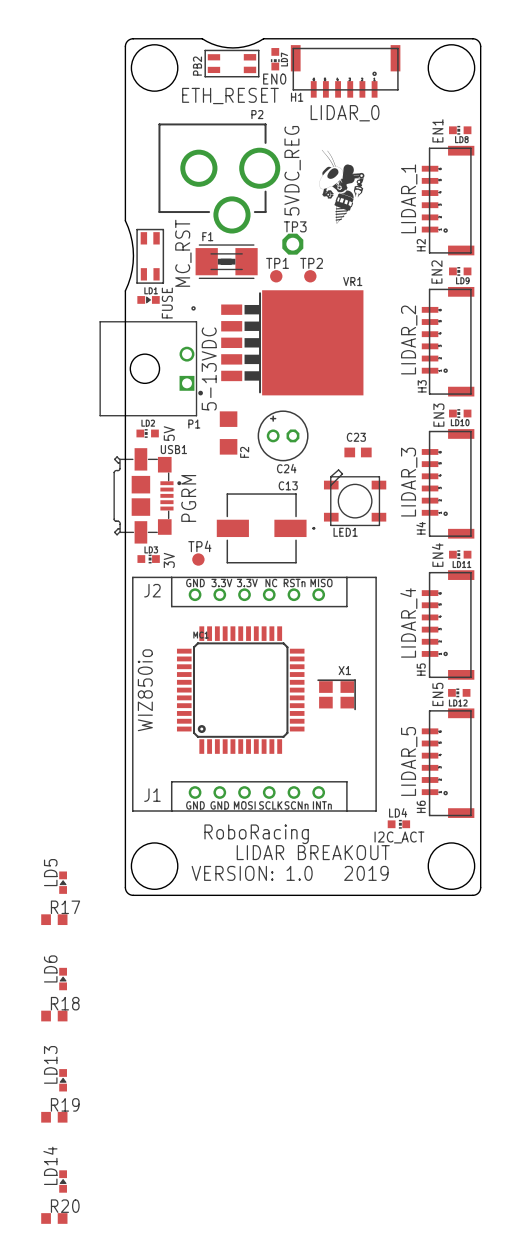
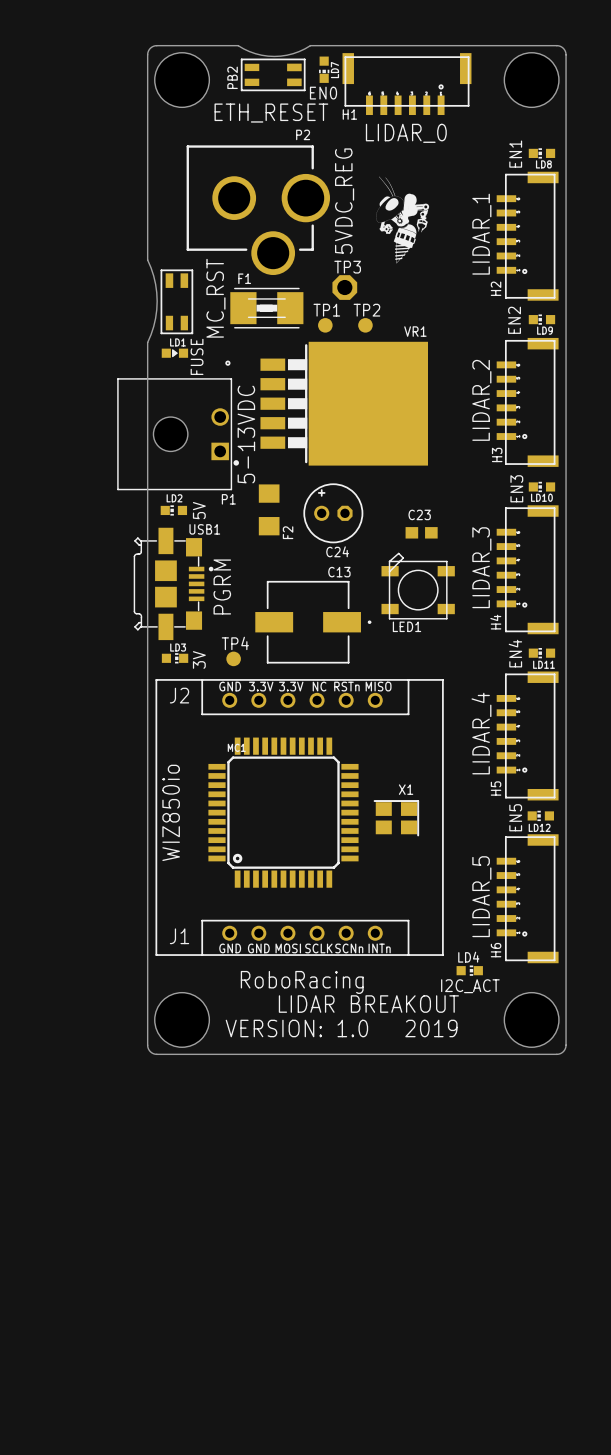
LD5: (63, 882) -> none
R17: (54, 919) -> none
LD6: (63, 979) -> none
R18: (54, 1016) -> none
LD13: (63, 1080) -> none
R19: (54, 1117) -> none
LD14: (63, 1181) -> none
R20: (54, 1218) -> none

